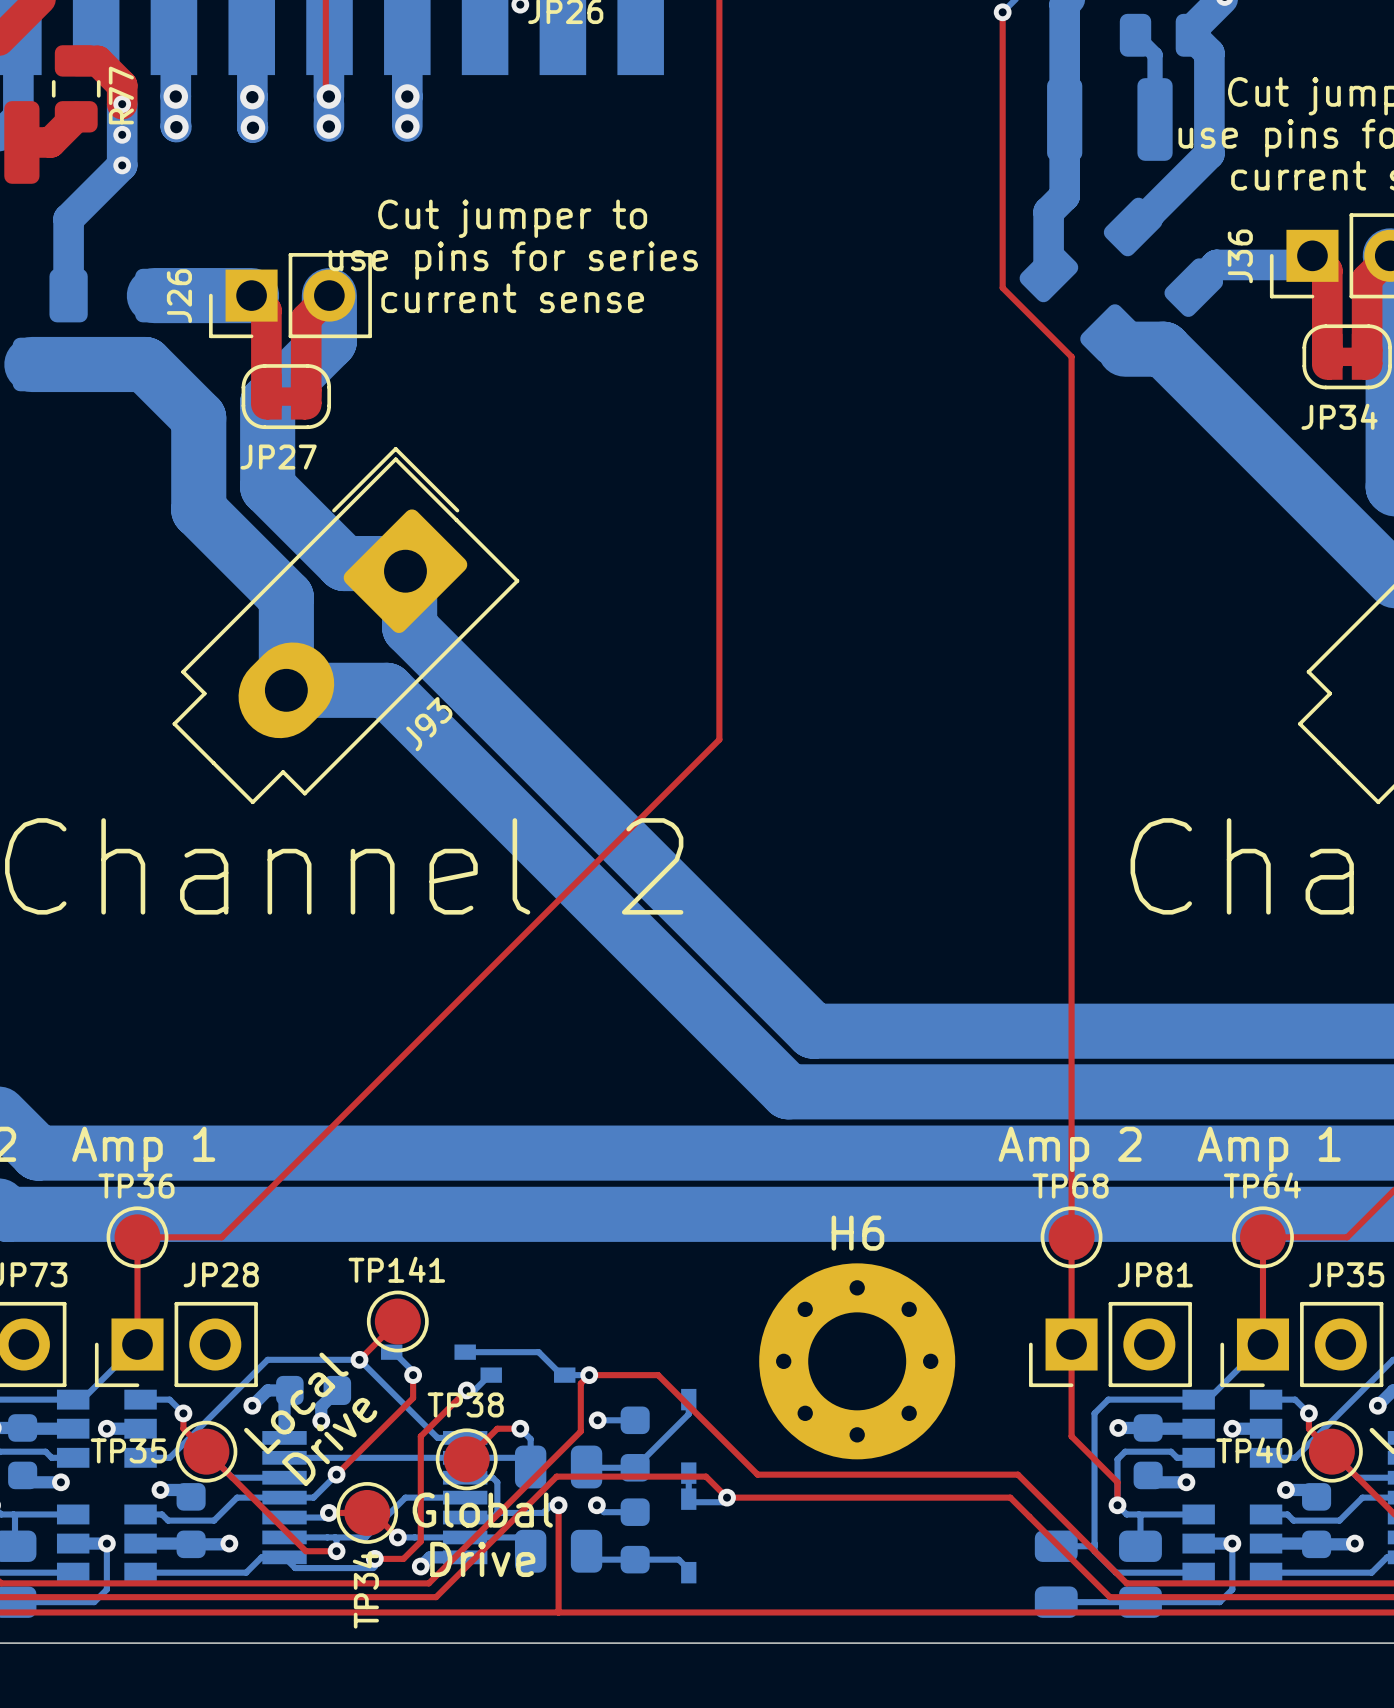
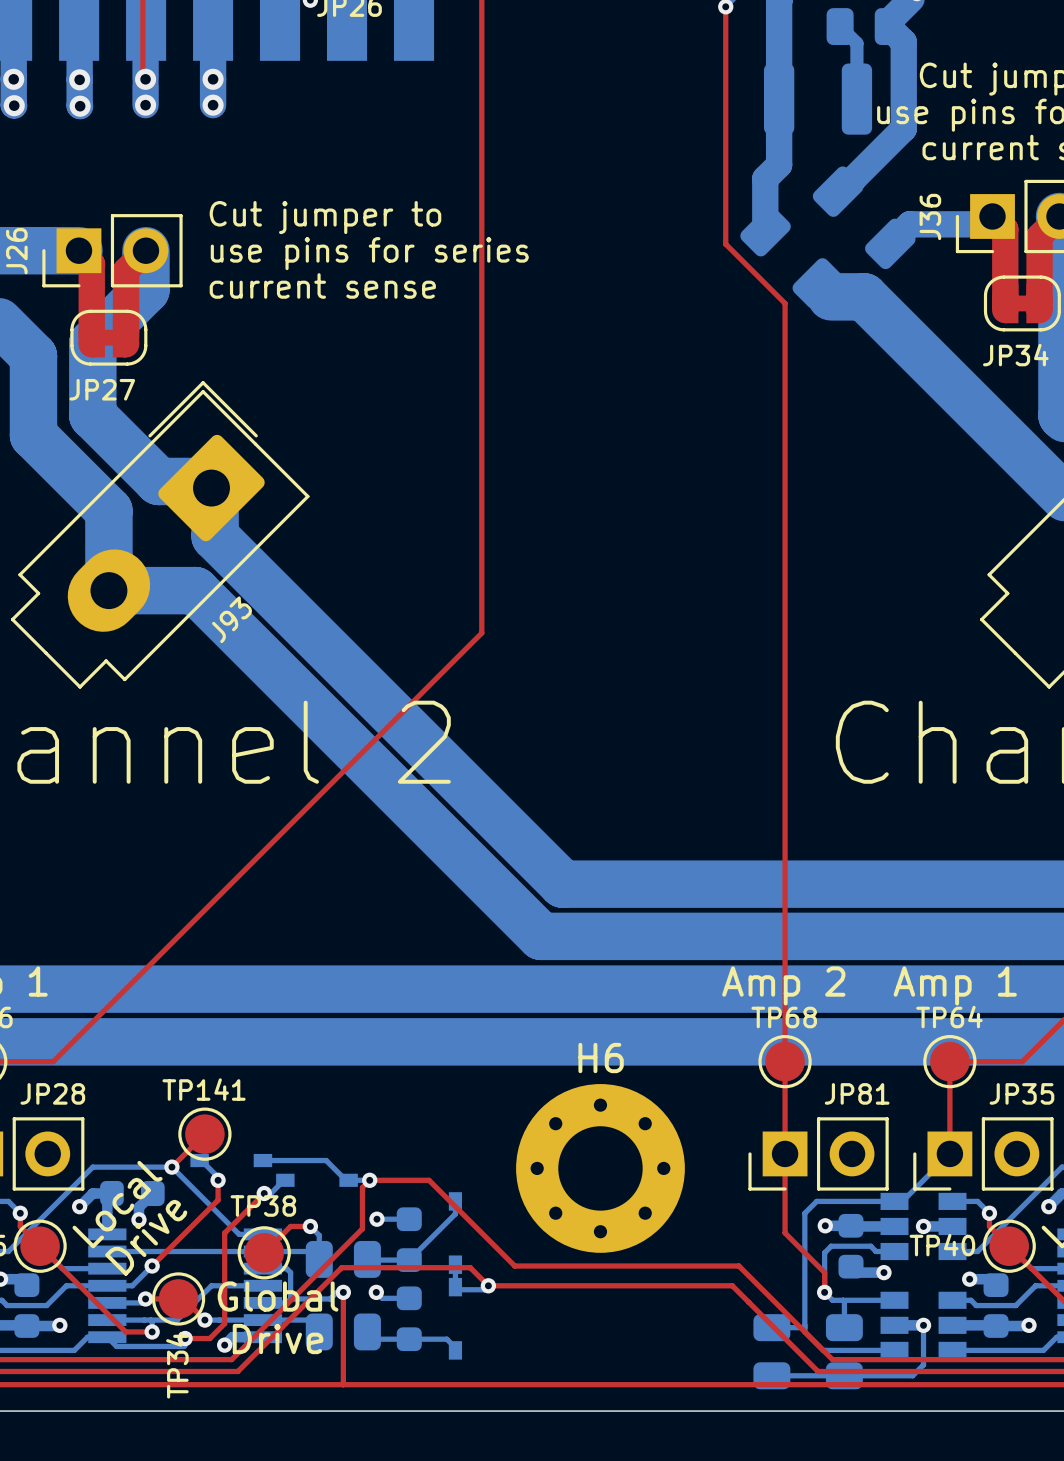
text position: Cut jumper to (512, 218) -> Cut jumper to (325, 217)
text position: use pins for series (513, 260) -> use pins for series (369, 253)
text position: current sense (512, 298) -> current sense (322, 285)

